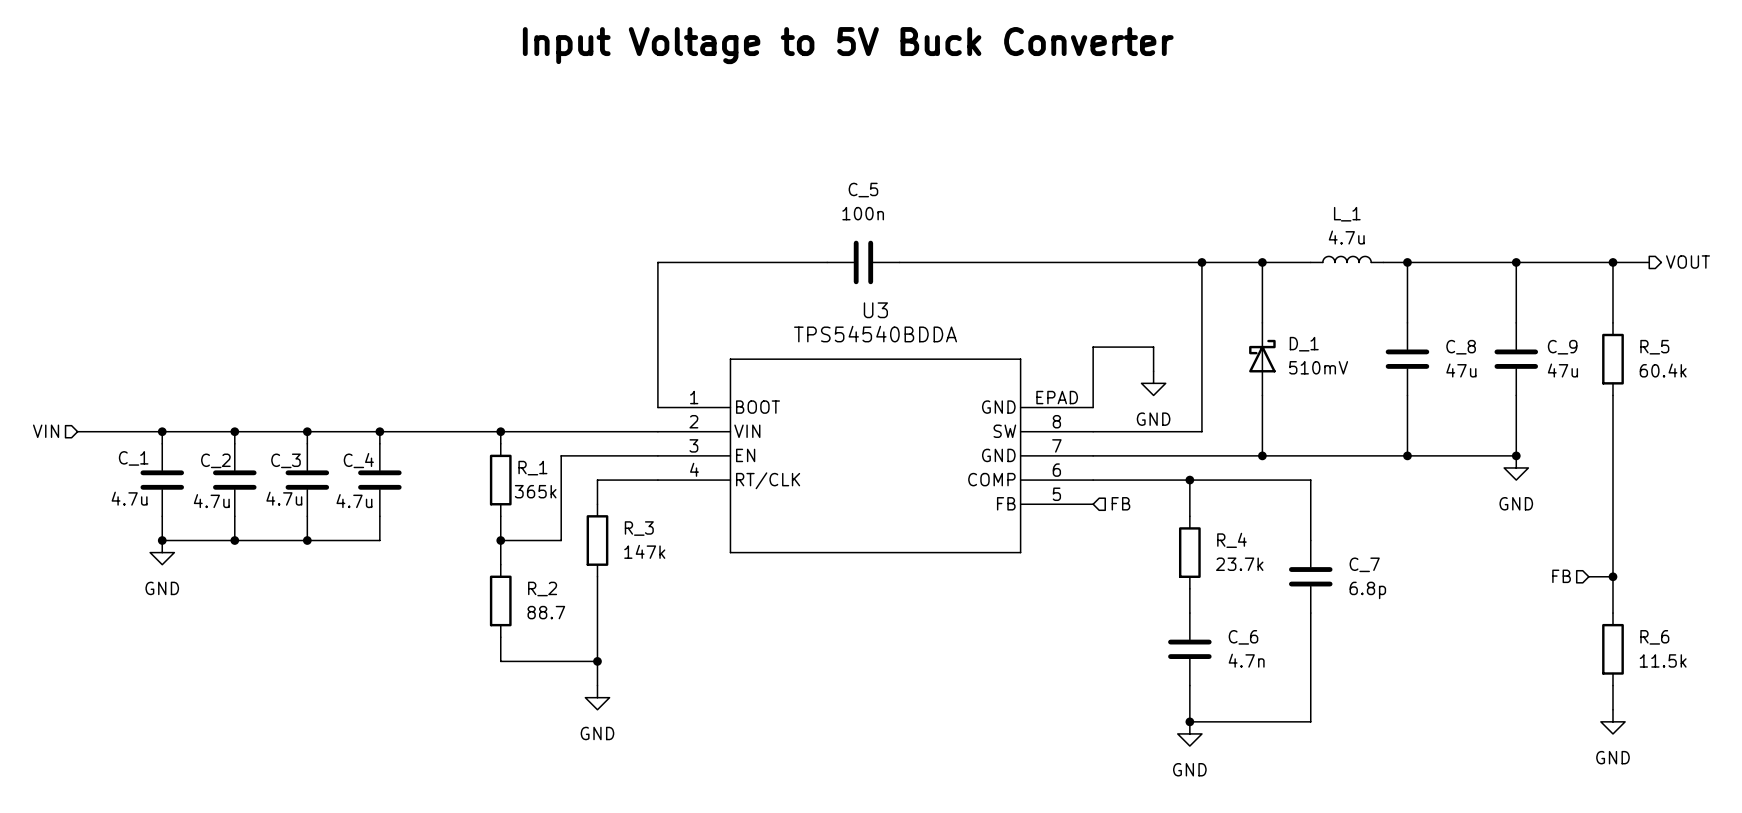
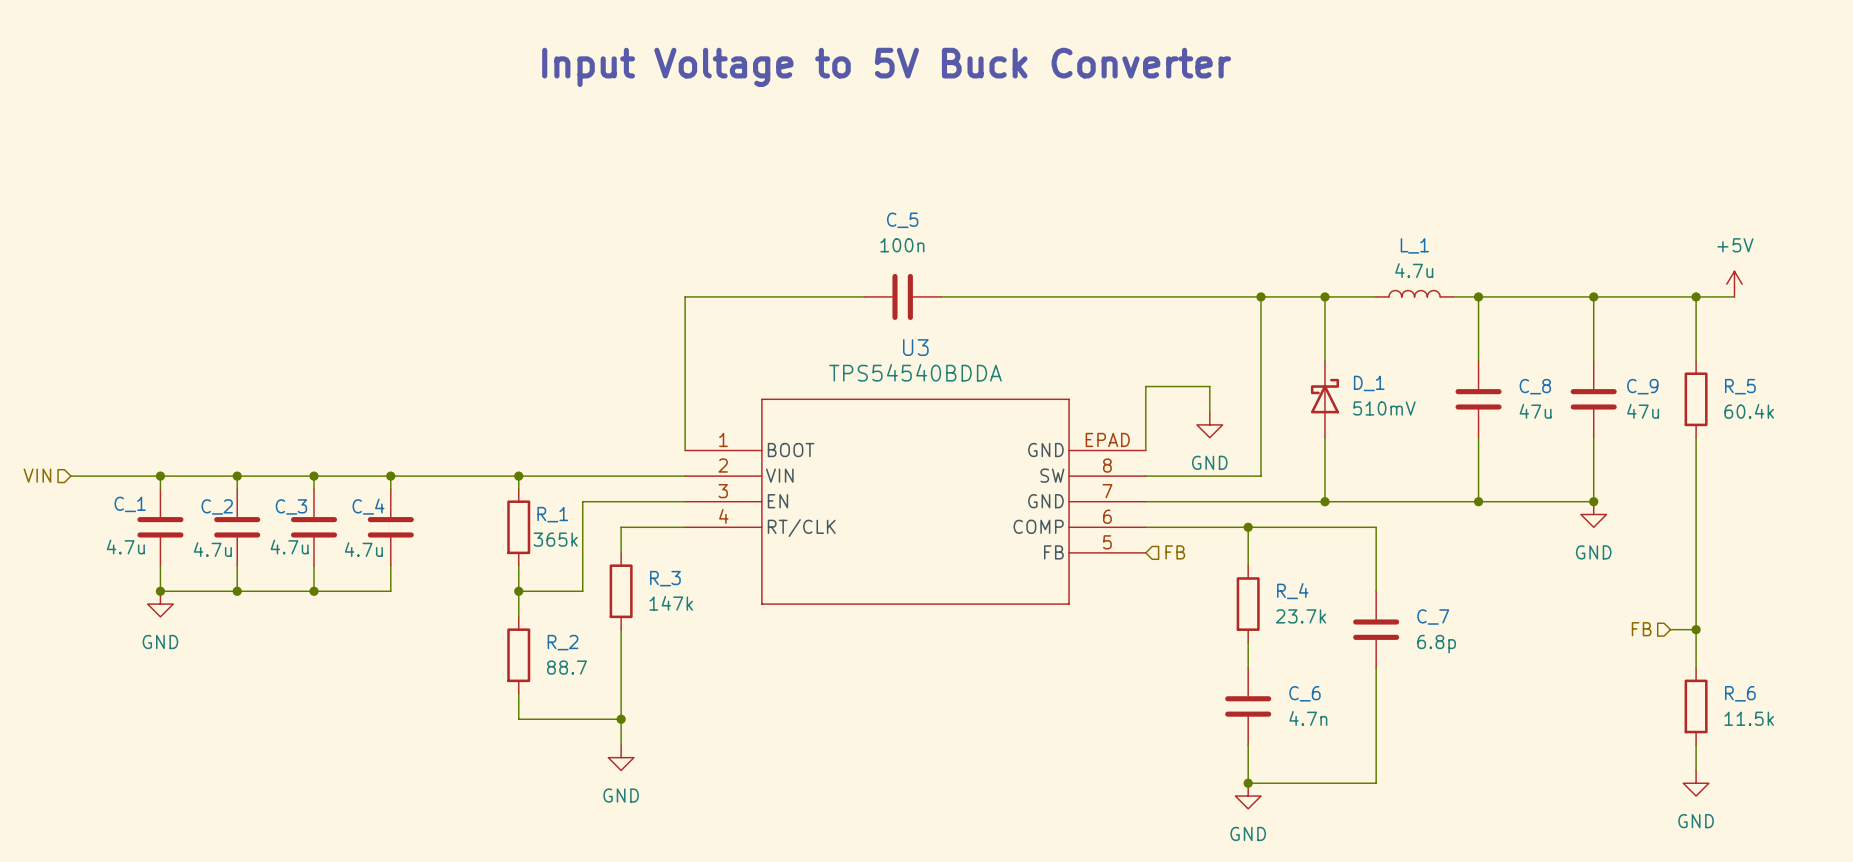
power symbol: none -> +5V (1734, 284)
hierarchical label: VOUT (1688, 262) -> none

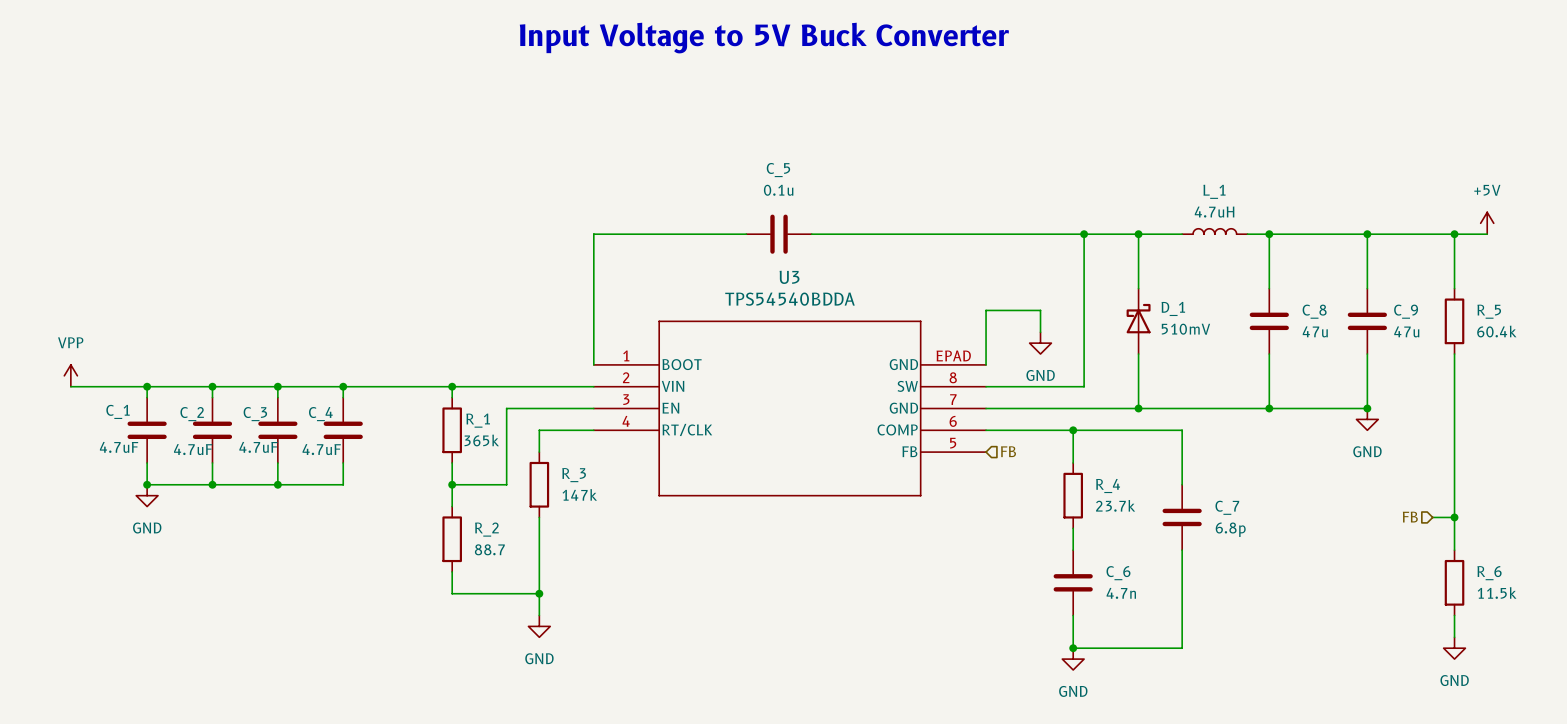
C_5 value: 100n (902, 245) -> 0.1u (778, 190)
L_1 value: 4.7u (1414, 270) -> 4.7uH (1214, 212)
power symbol: none -> VPP (70, 375)
hierarchical label: VIN (37, 475) -> none
C_1 value: 4.7u (125, 546) -> 4.7uF (119, 447)
C_3 value: 4.7u (289, 546) -> 4.7uF (258, 447)
C_2 value: 4.7u (212, 549) -> 4.7uF (193, 449)
C_4 value: 4.7u (363, 549) -> 4.7uF (321, 449)

